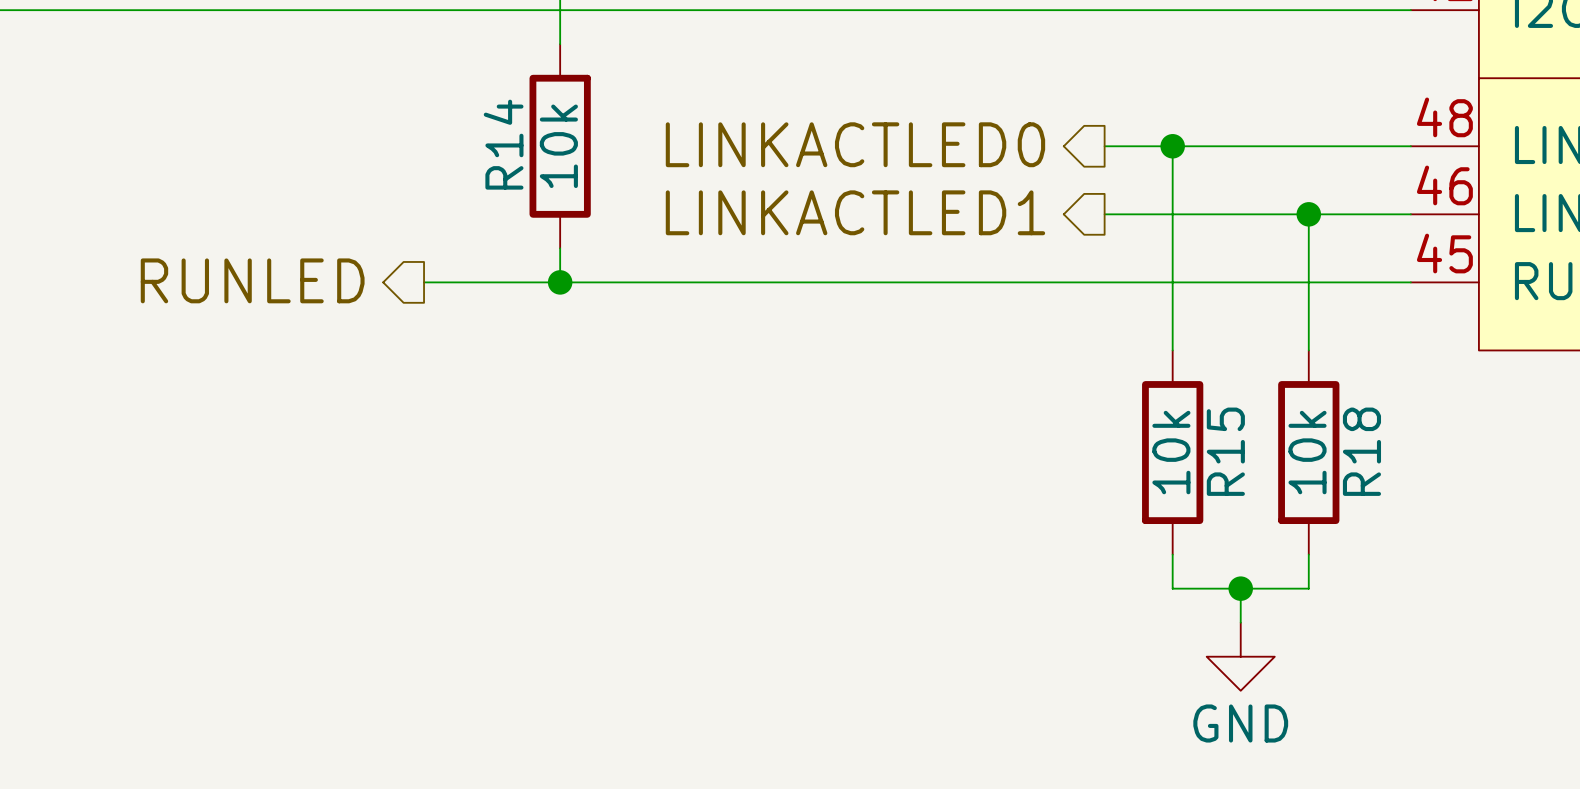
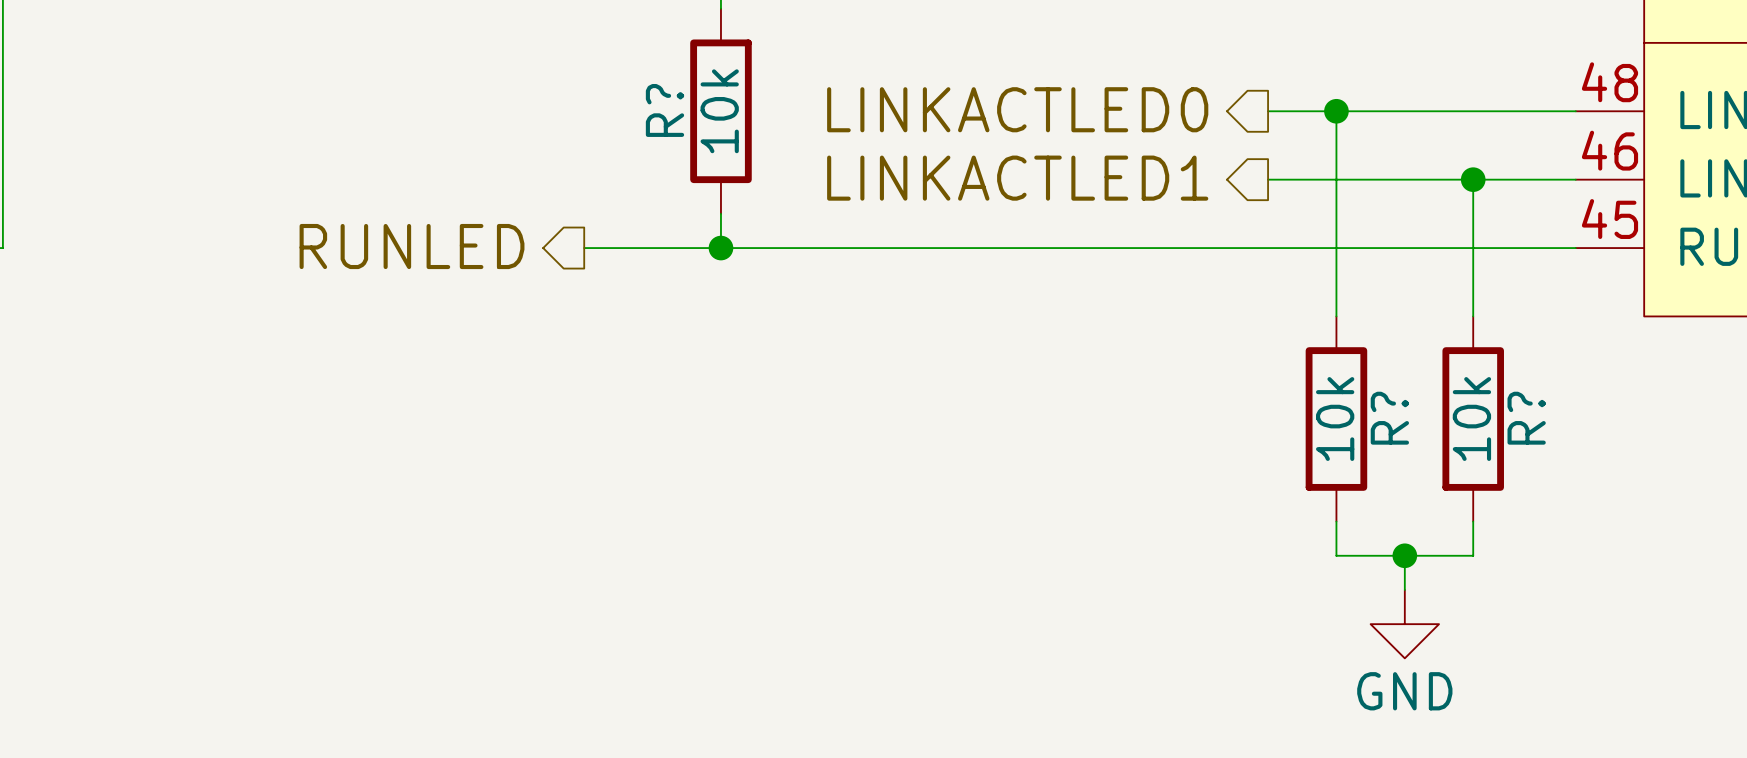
R14 name: R14 (503, 144) -> R? (664, 110)
R15 name: R15 (1225, 451) -> R? (1389, 418)
R18 name: R18 (1361, 451) -> R? (1526, 418)

